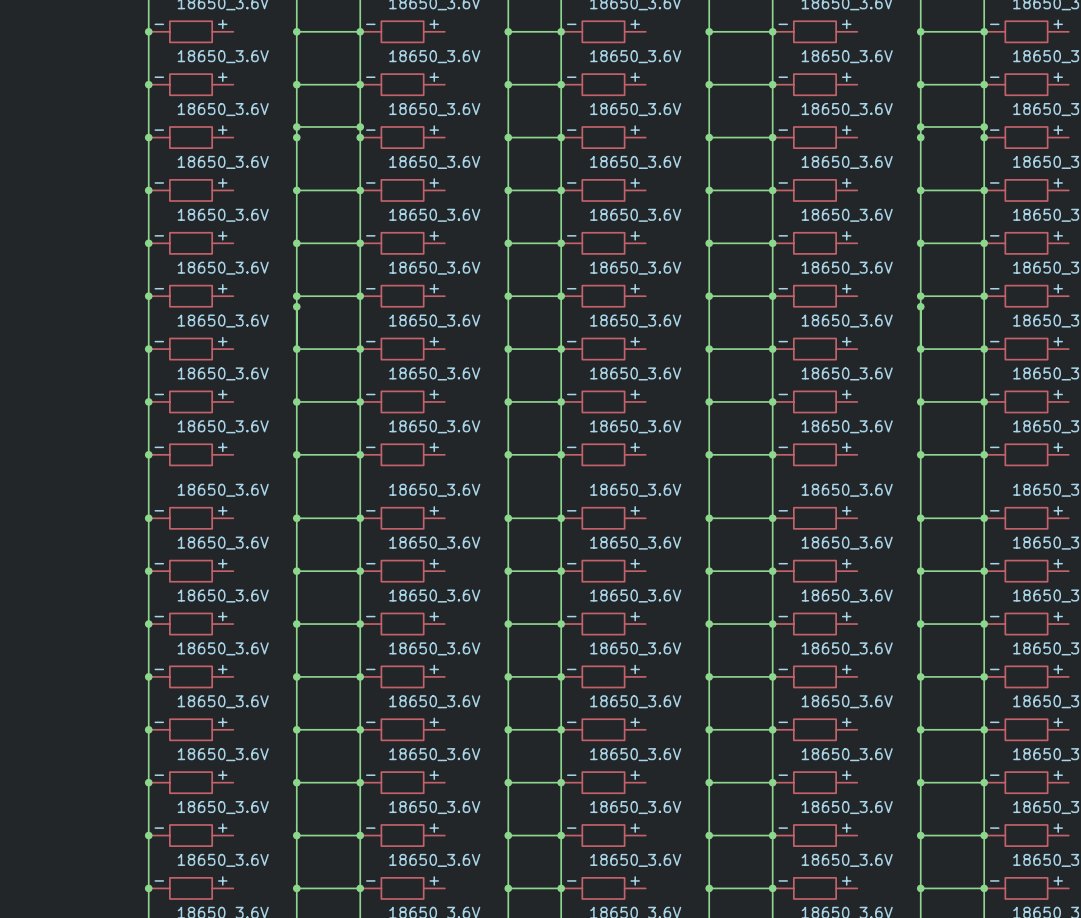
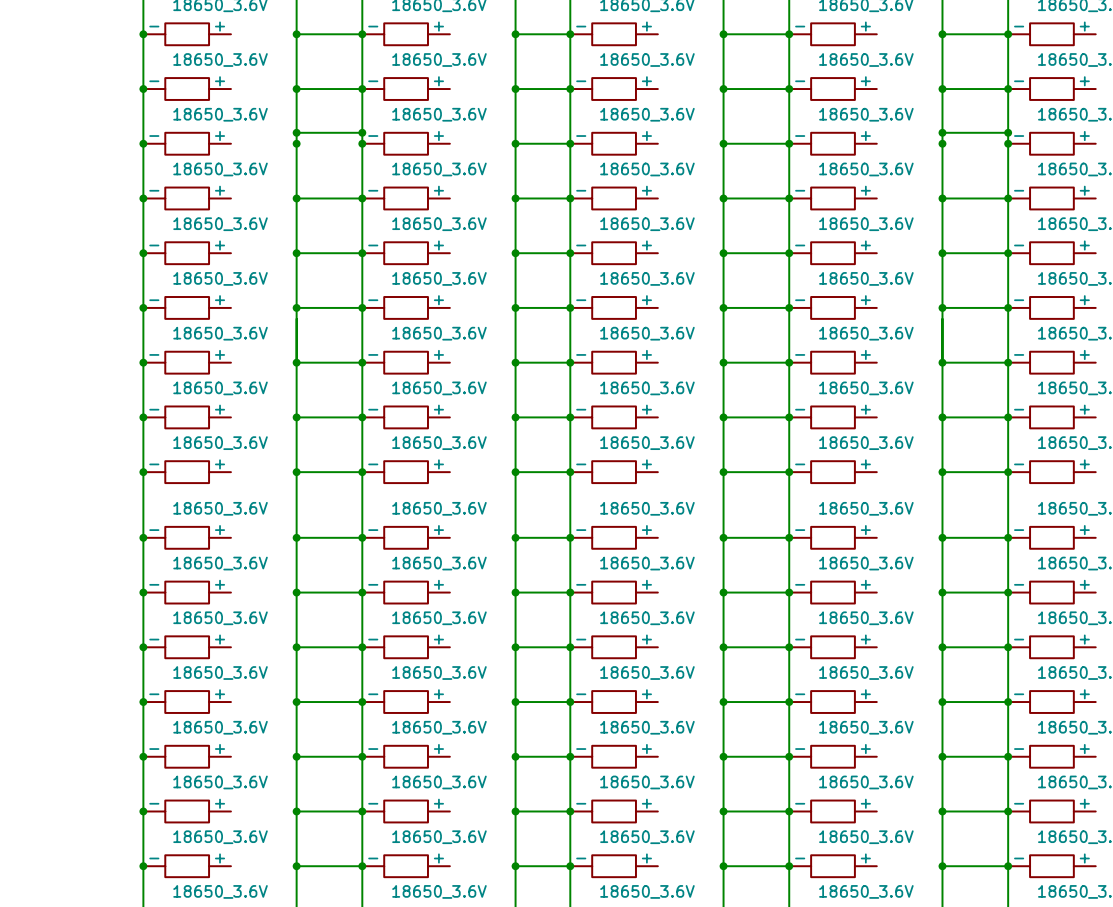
junction: (296, 306) -> none
junction: (920, 306) -> none

